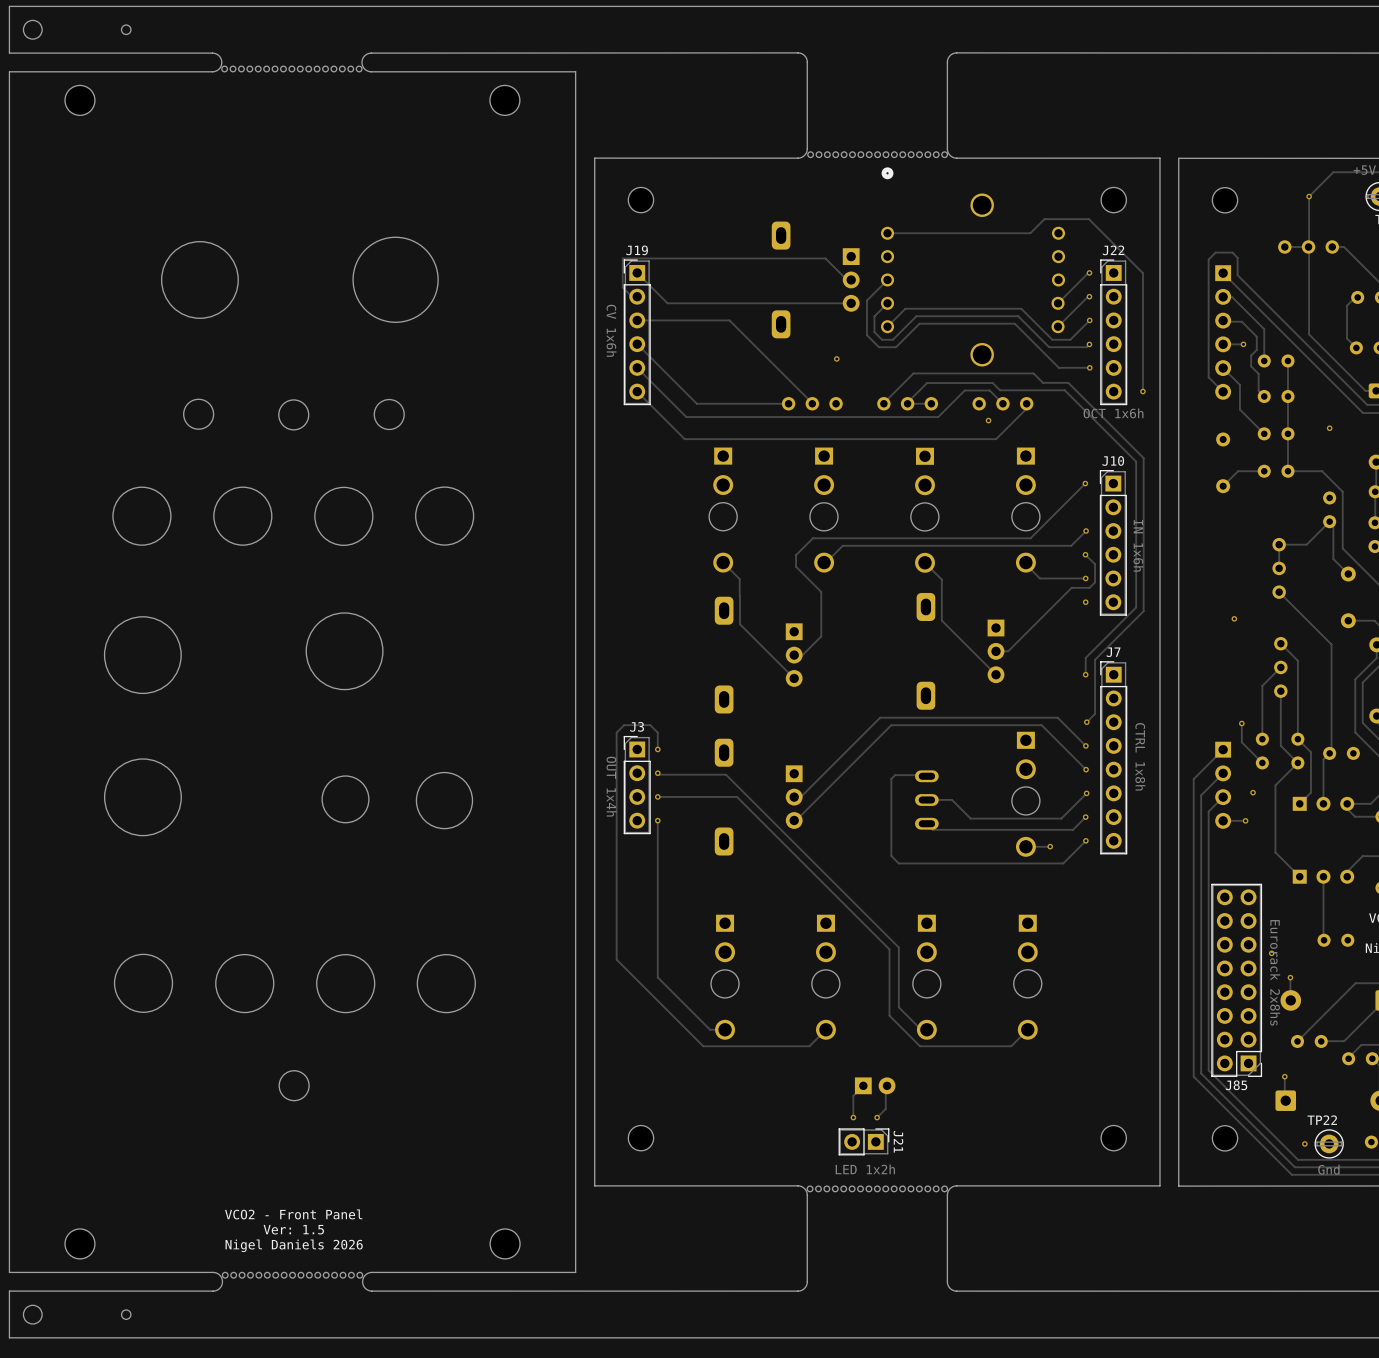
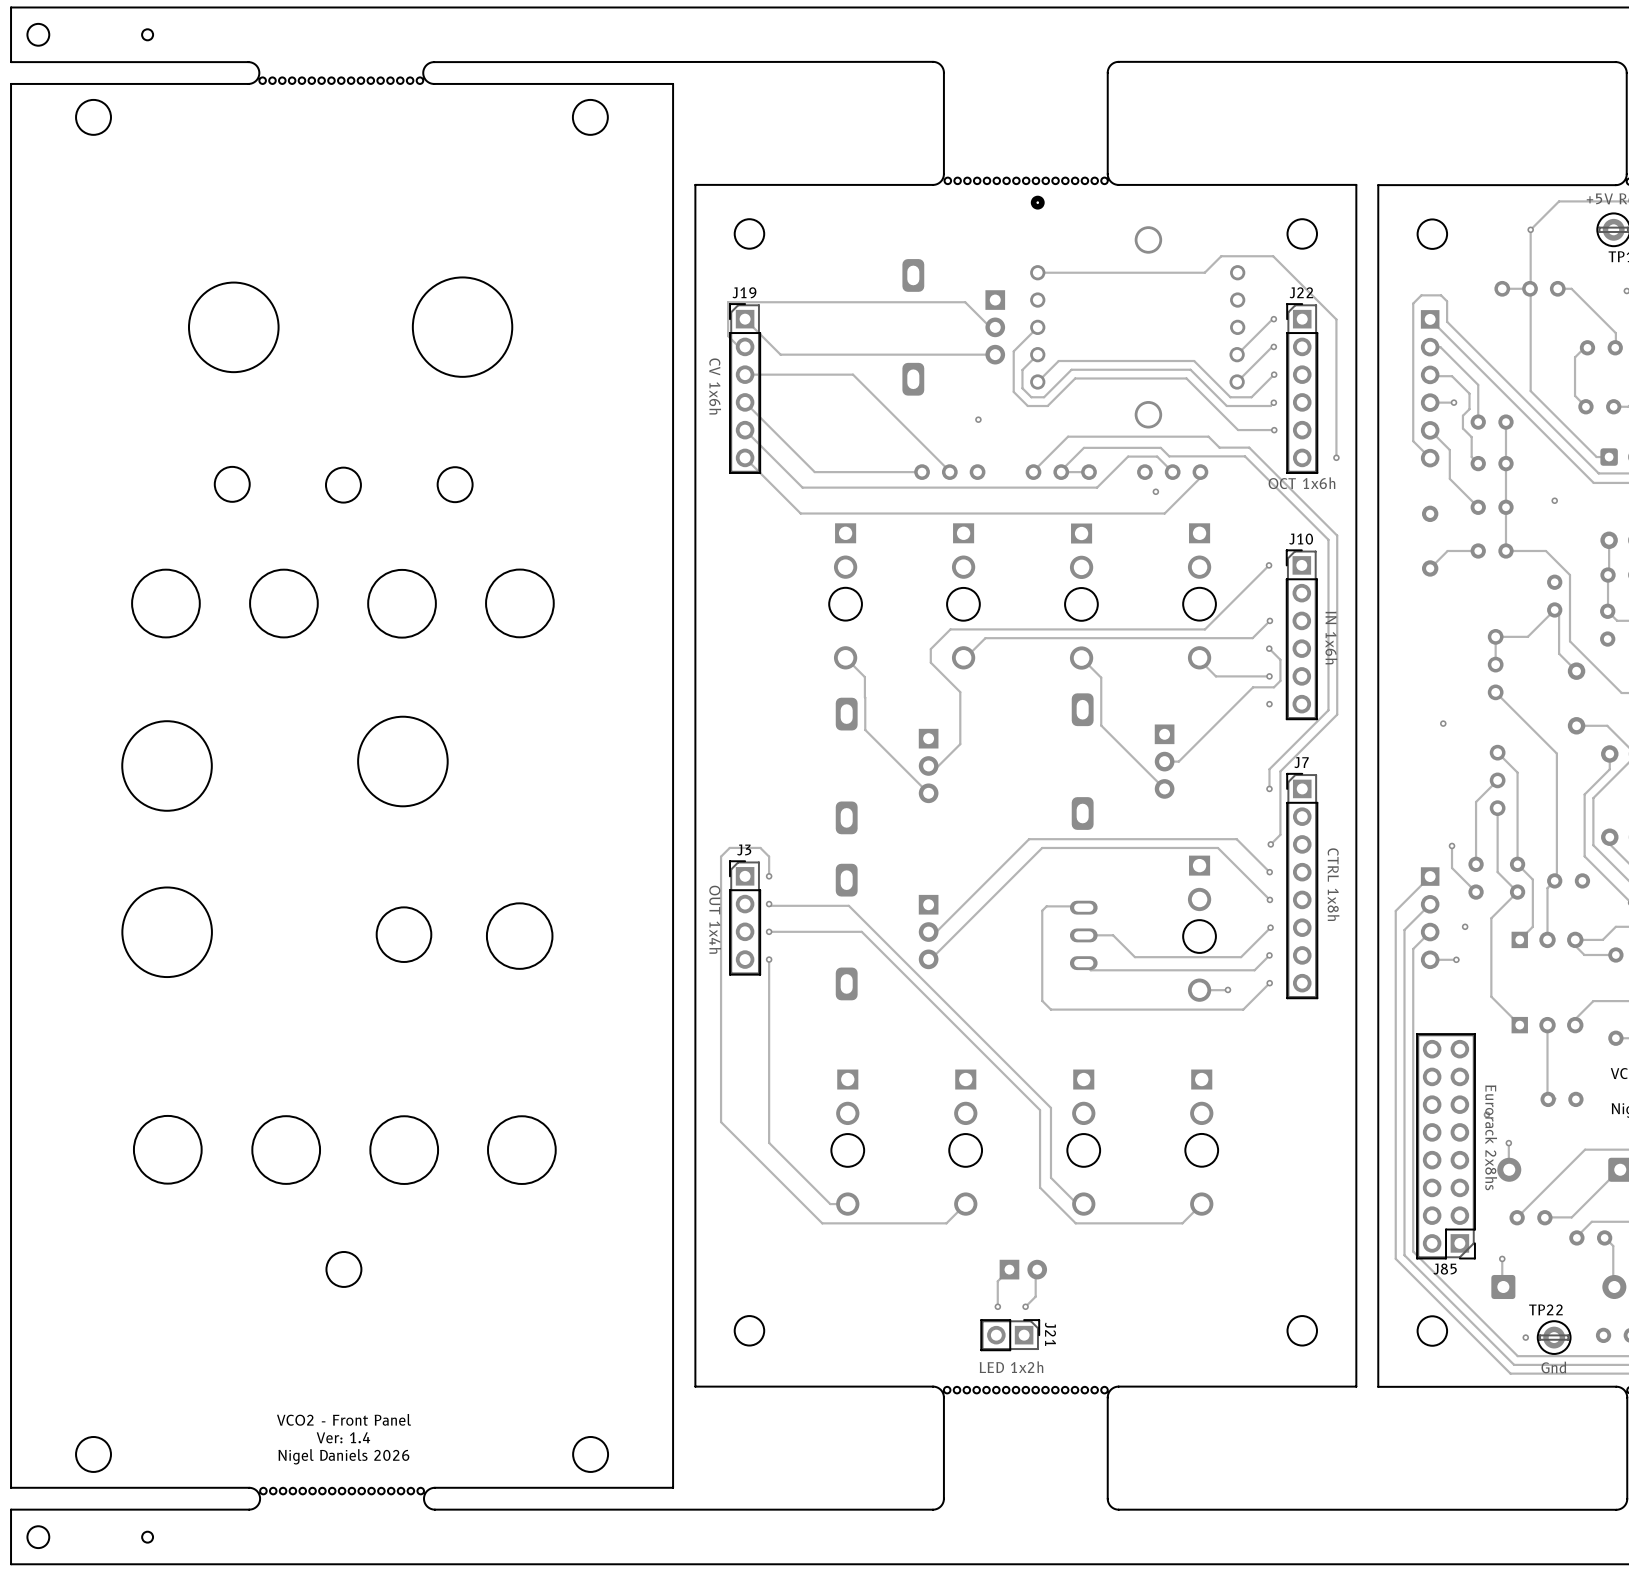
text: Ver: 1.5 (293, 1229) -> Ver: 1.4 (343, 1437)

